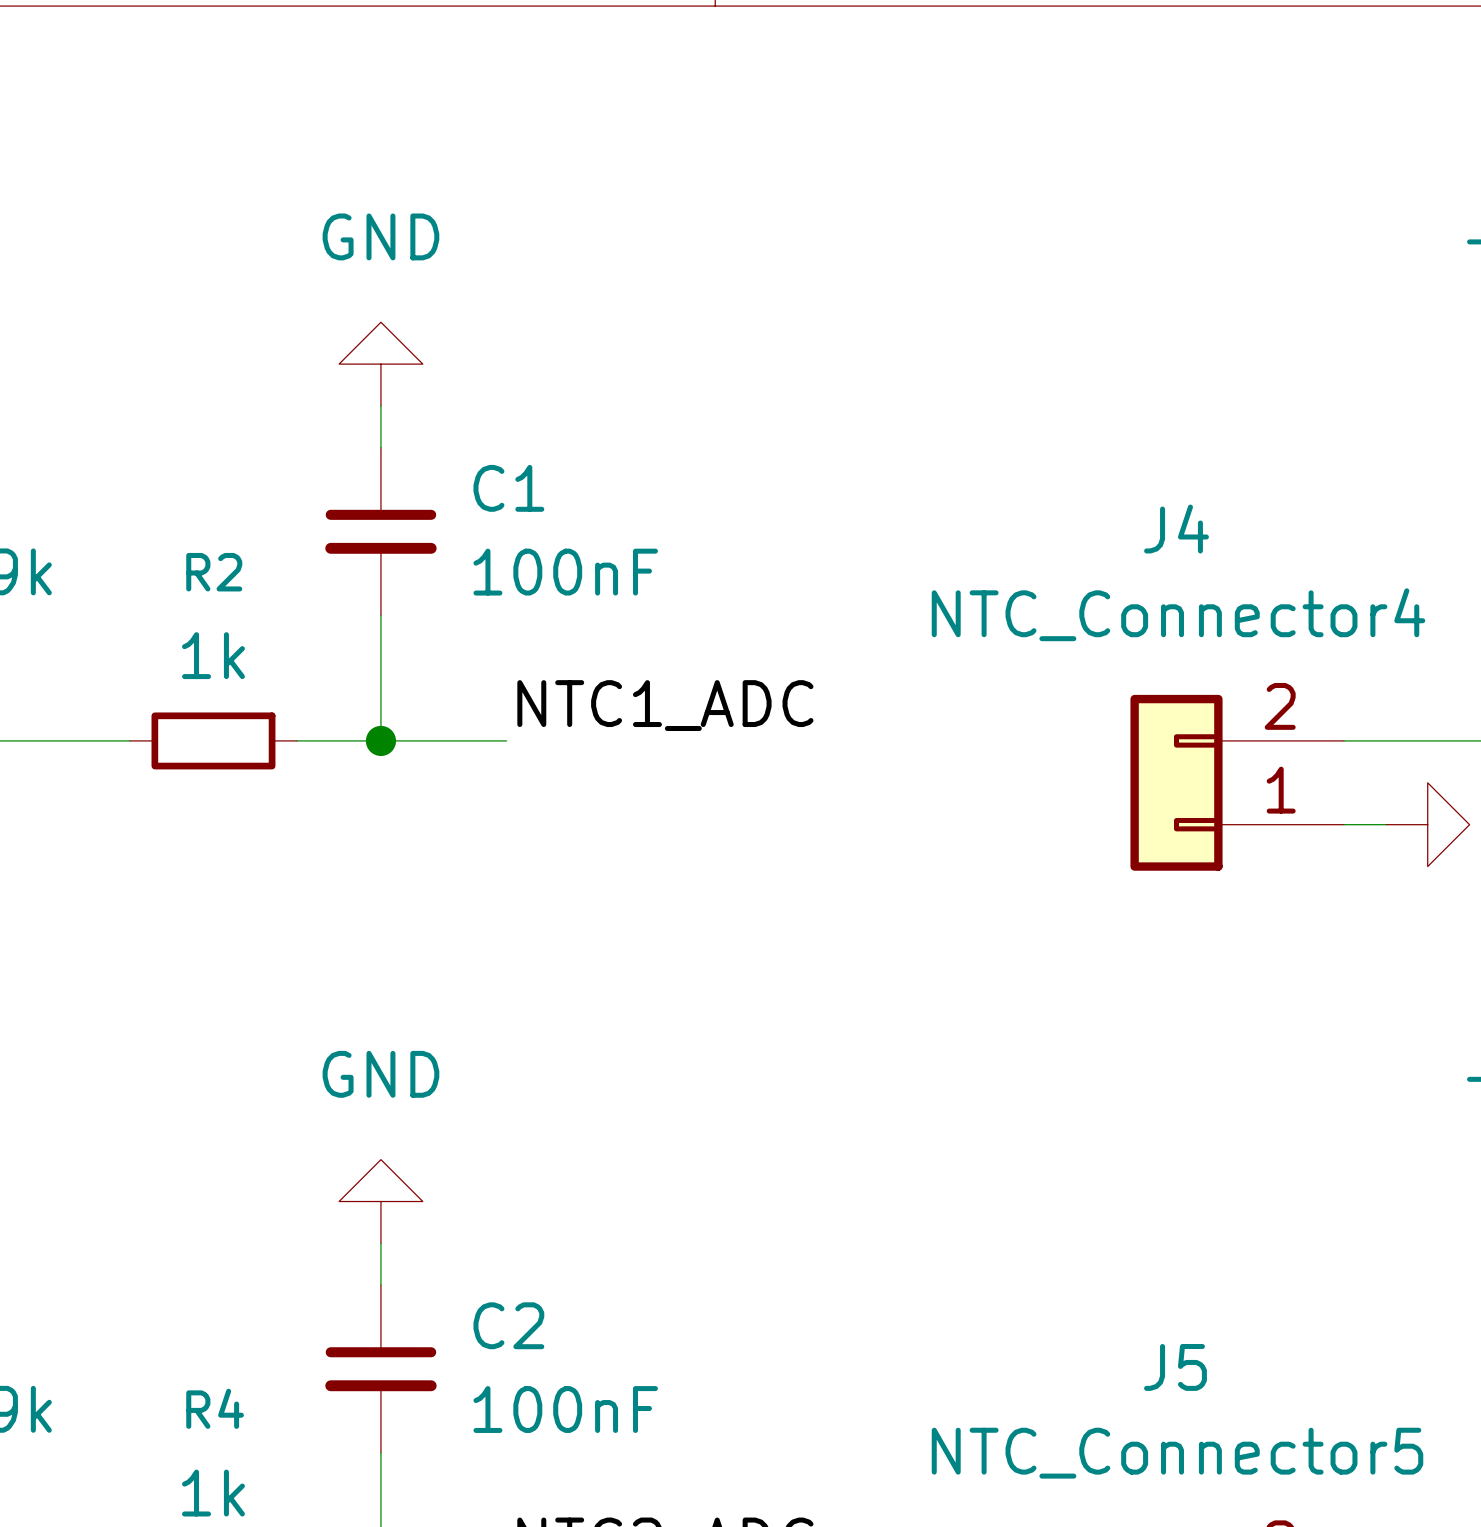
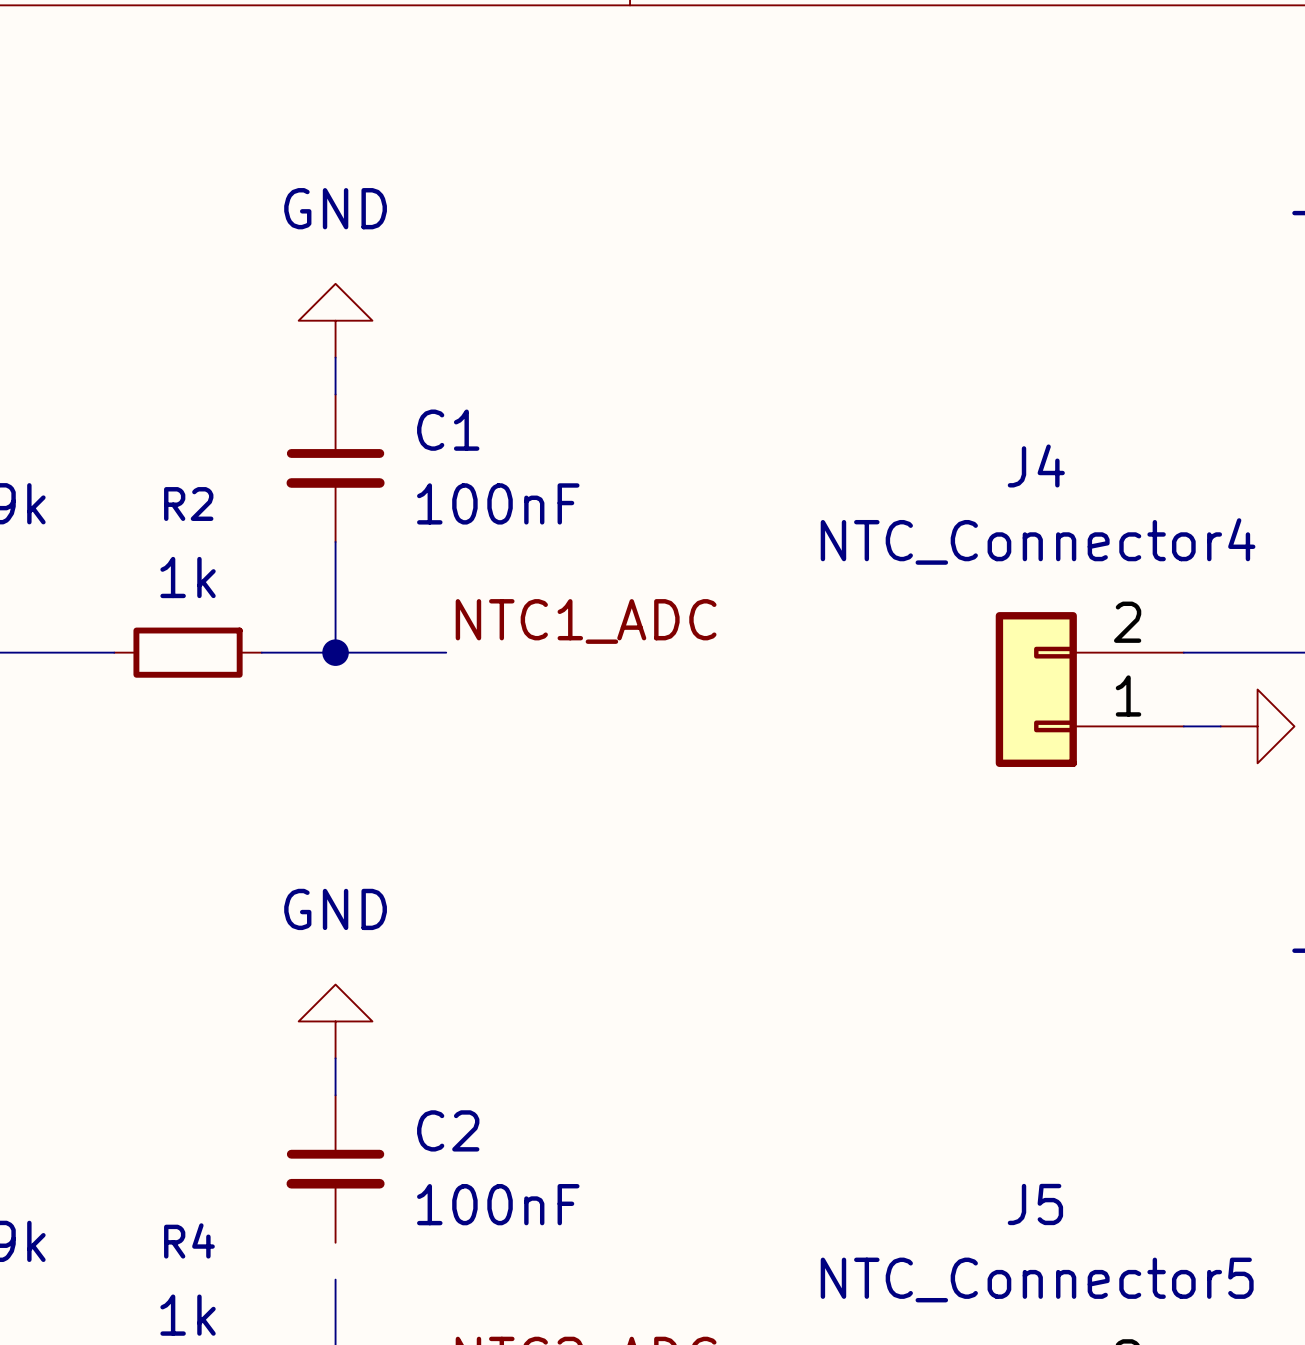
power symbol position: GND (380, 1201) -> GND (335, 1021)
C2 position: (380, 1369) -> (335, 1168)

